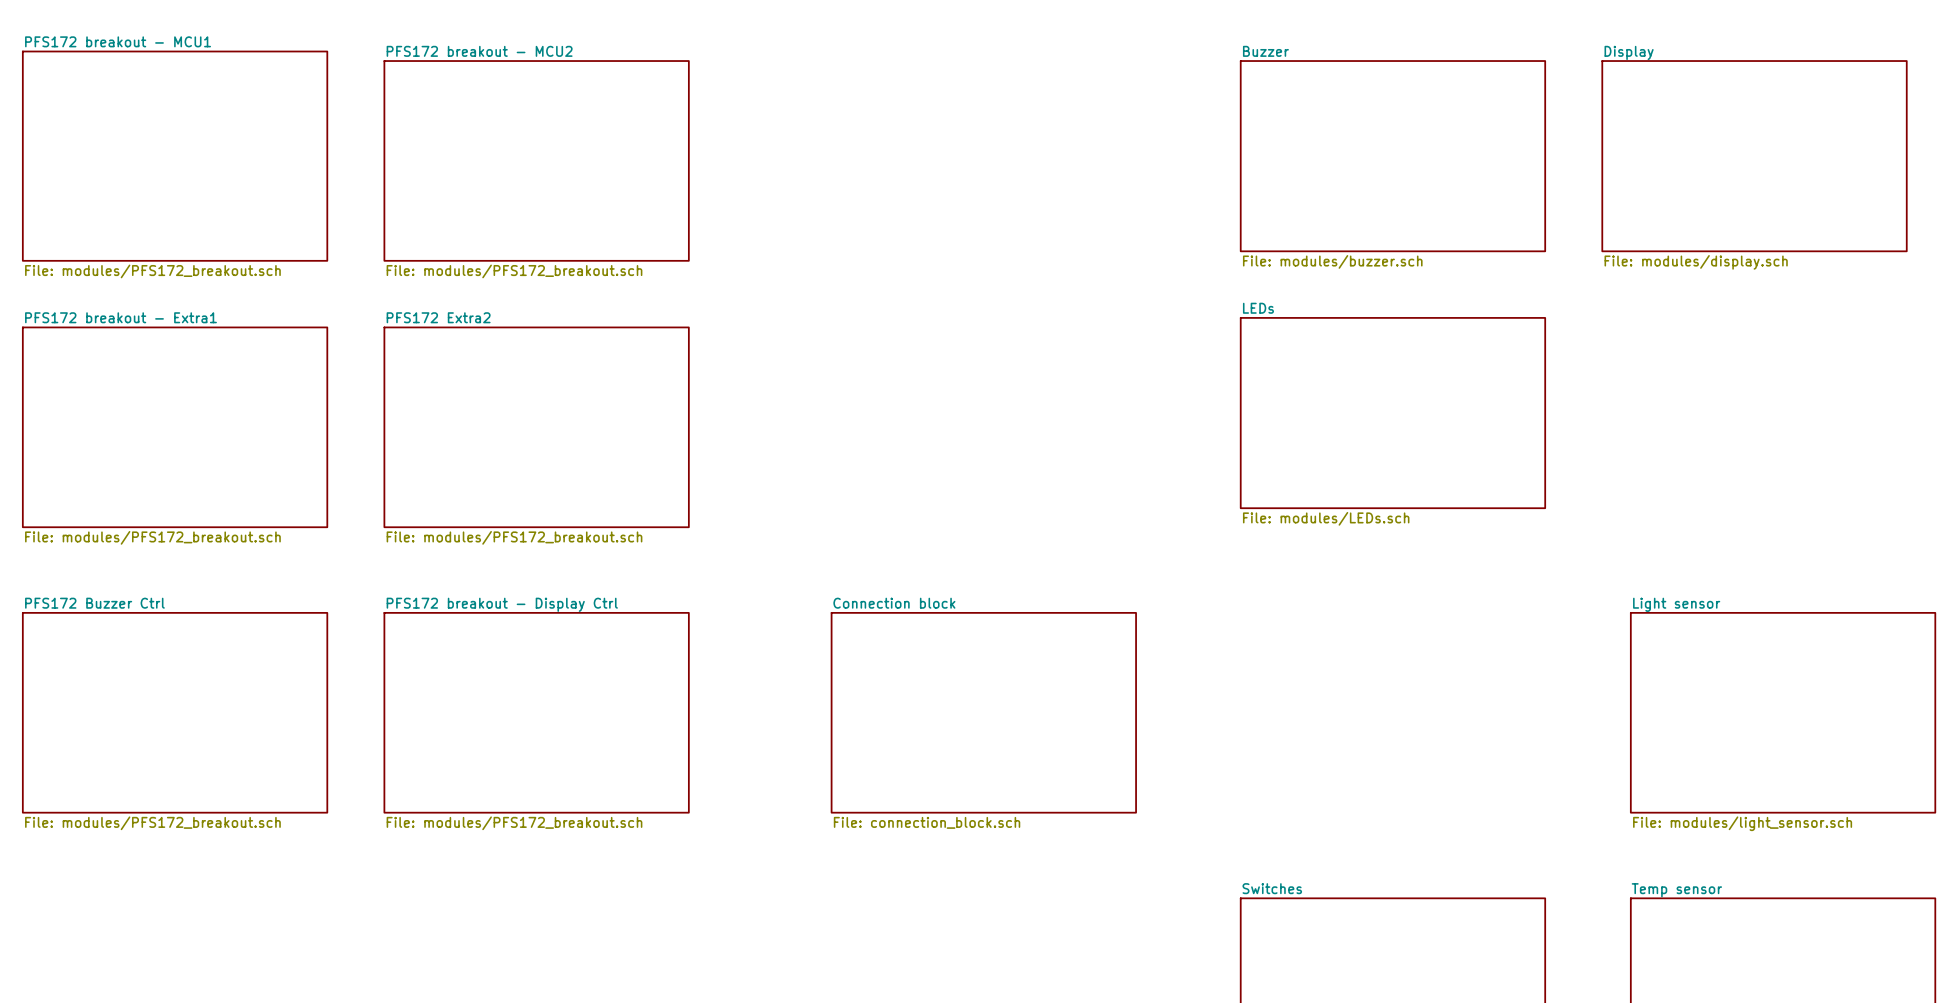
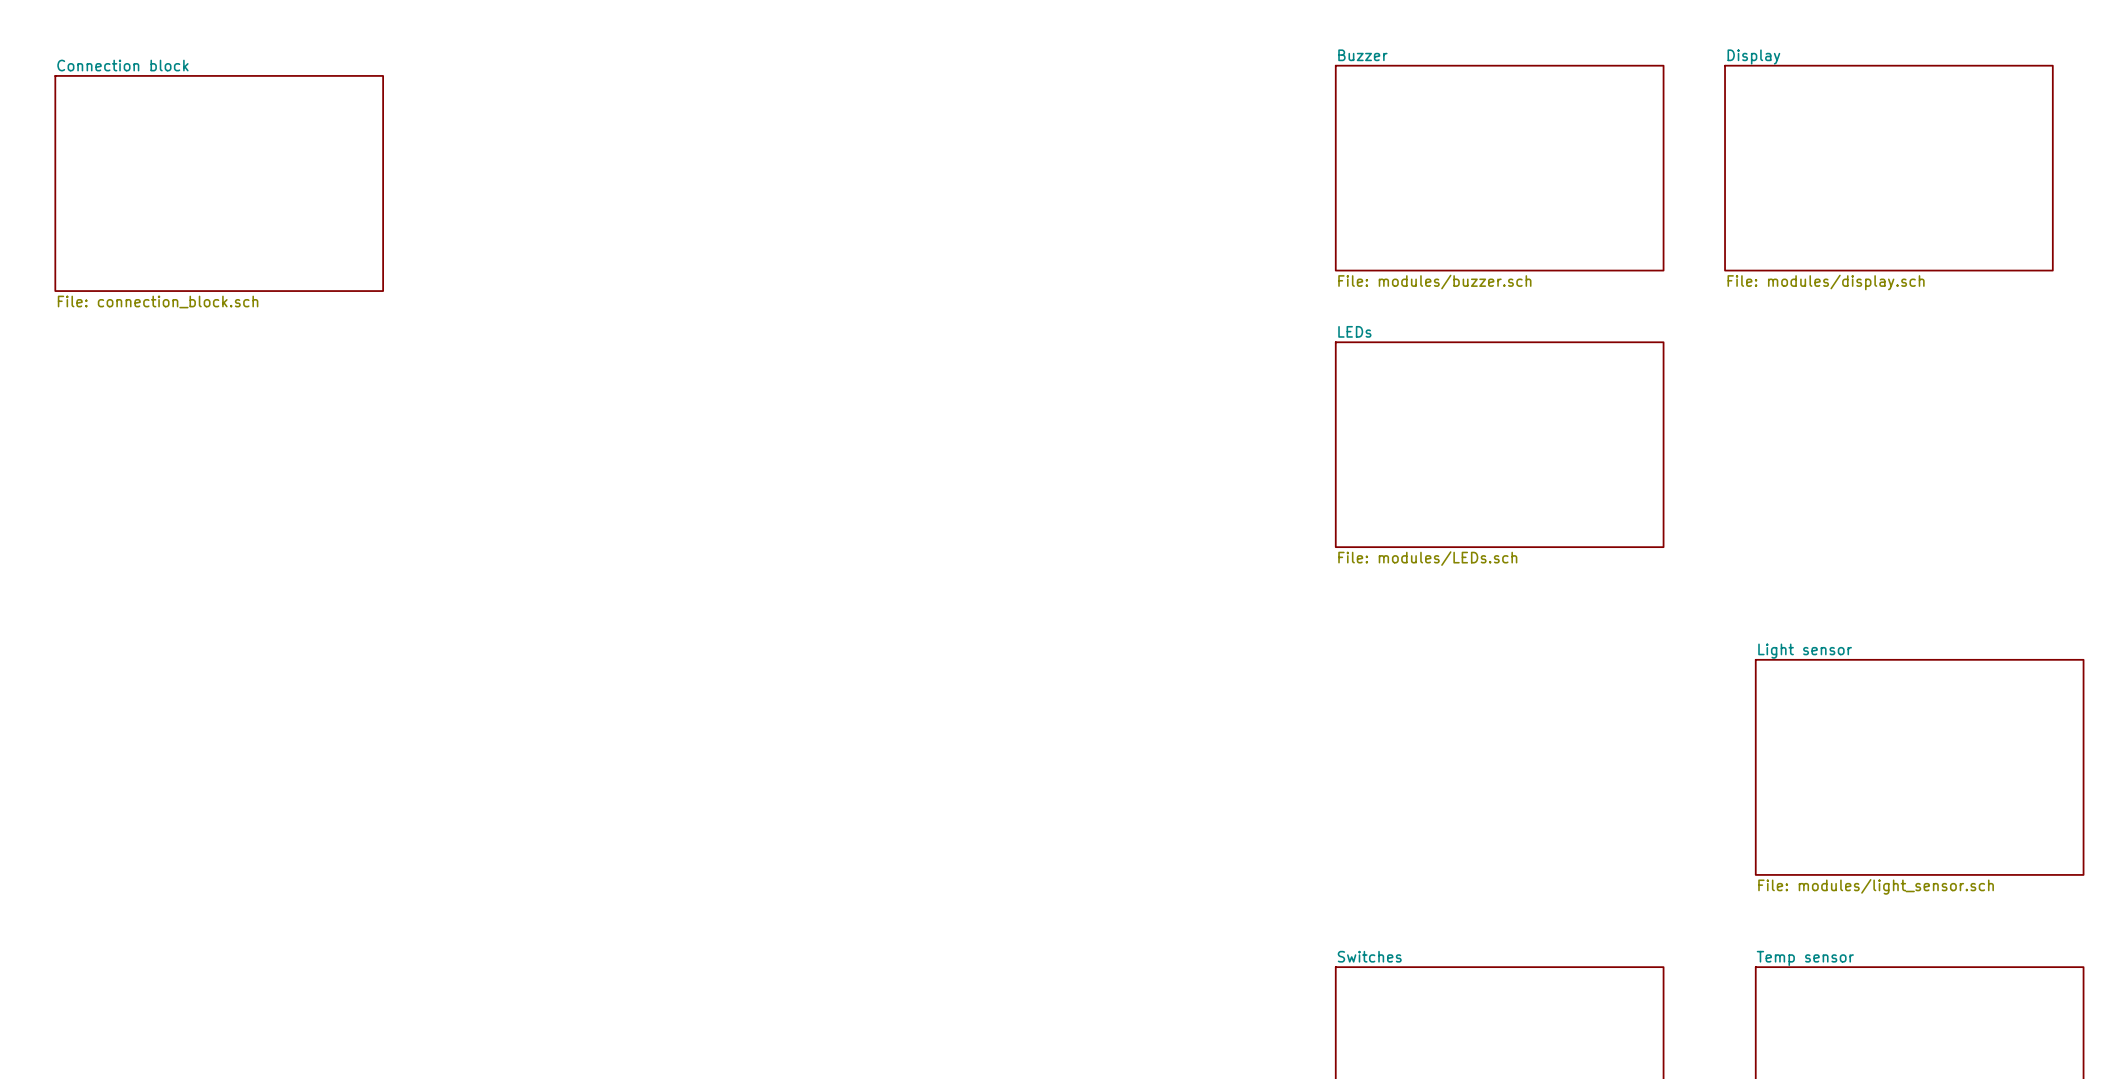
sheet PFS172 breakout - MCU1: File: modules/PFS172_breakout.sch (175, 156) -> none
sheet PFS172 breakout - MCU2: File: modules/PFS172_breakout.sch (536, 160) -> none
sheet Connection block: none -> File: connection_block.sch (219, 183)
sheet PFS172 breakout - Extra1: File: modules/PFS172_breakout.sch (175, 427) -> none
sheet PFS172 Extra2: File: modules/PFS172_breakout.sch (536, 427) -> none
sheet PFS172 Buzzer Ctrl: File: modules/PFS172_breakout.sch (175, 712) -> none
sheet PFS172 breakout - Display Ctrl: File: modules/PFS172_breakout.sch (536, 712) -> none
sheet Connection block: File: connection_block.sch (983, 712) -> none

